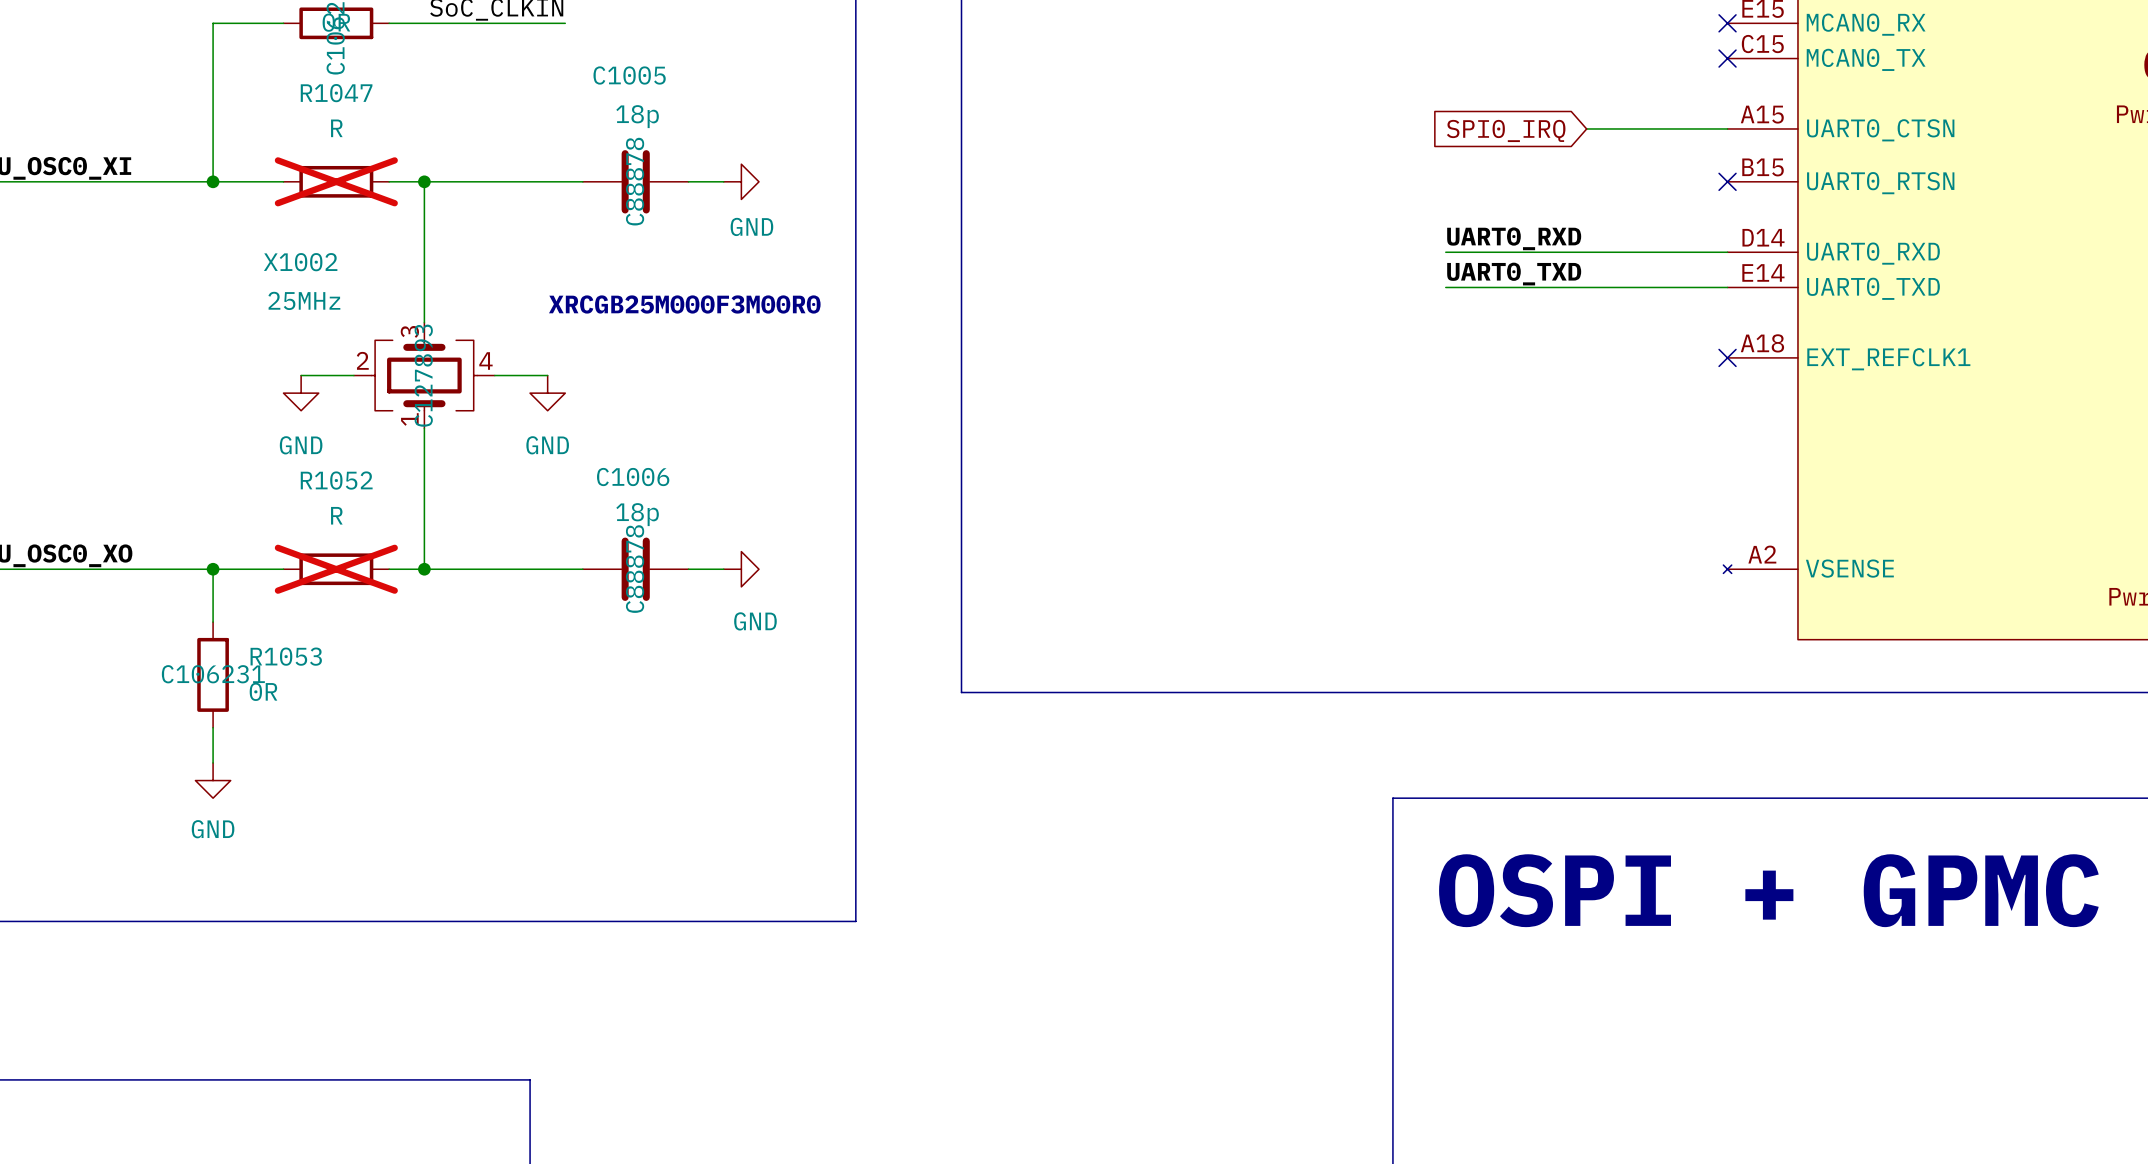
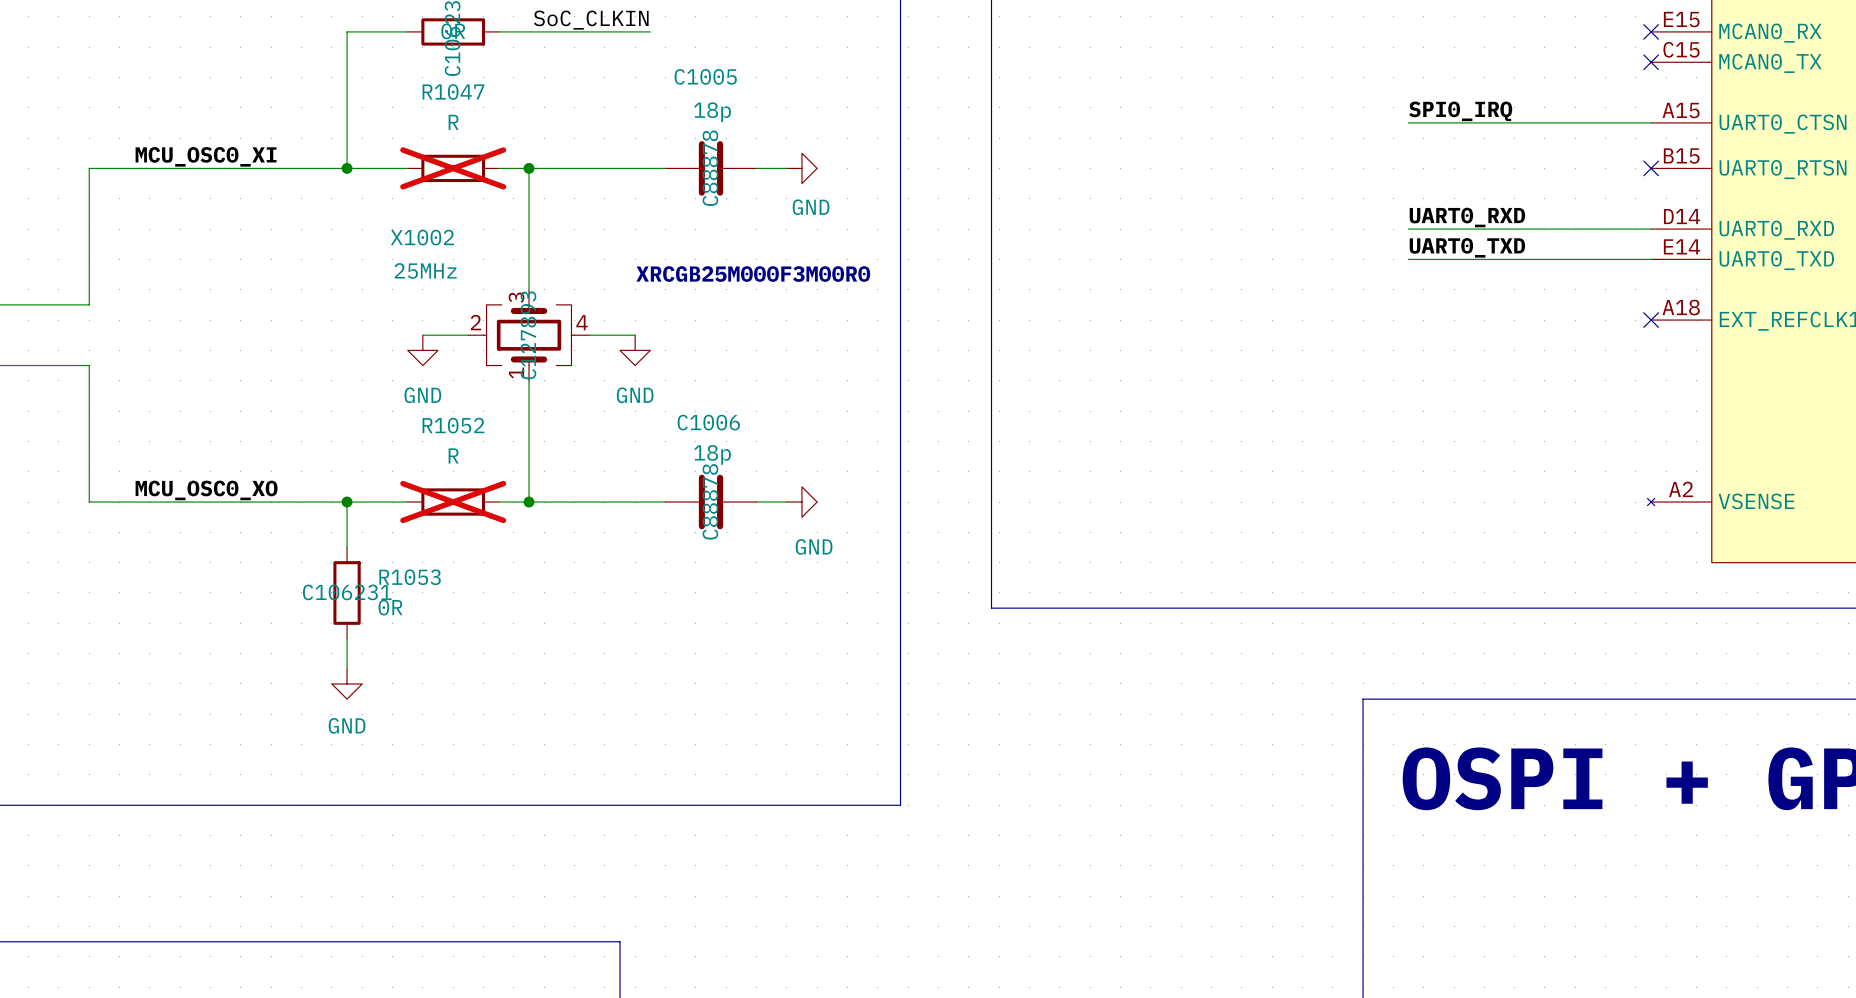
label: none -> SPI0_IRQ (1460, 111)
wire: none -> (1408, 122) (1529, 122)
global label: SPI0_IRQ (1506, 130) -> none

